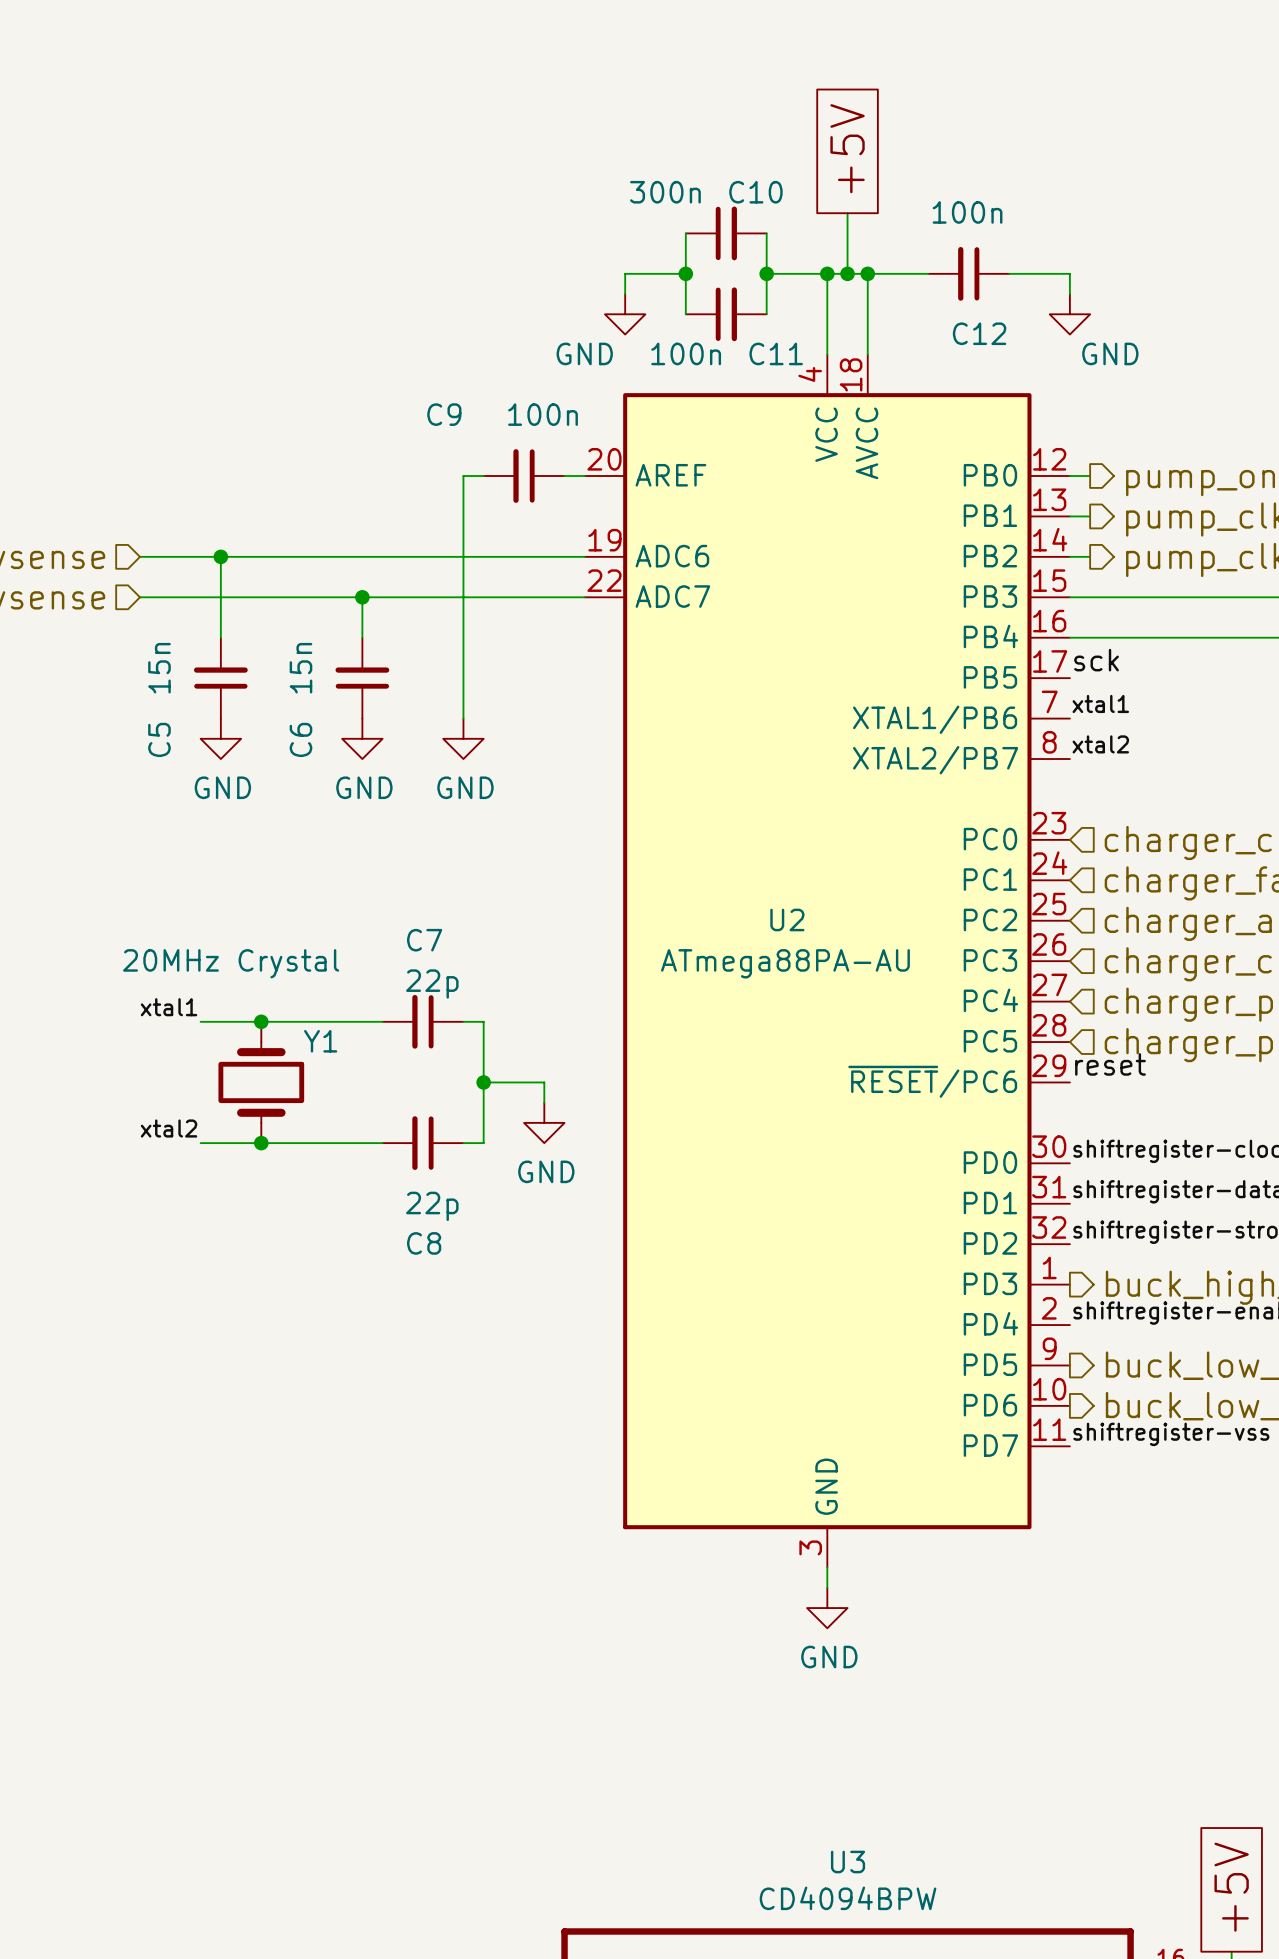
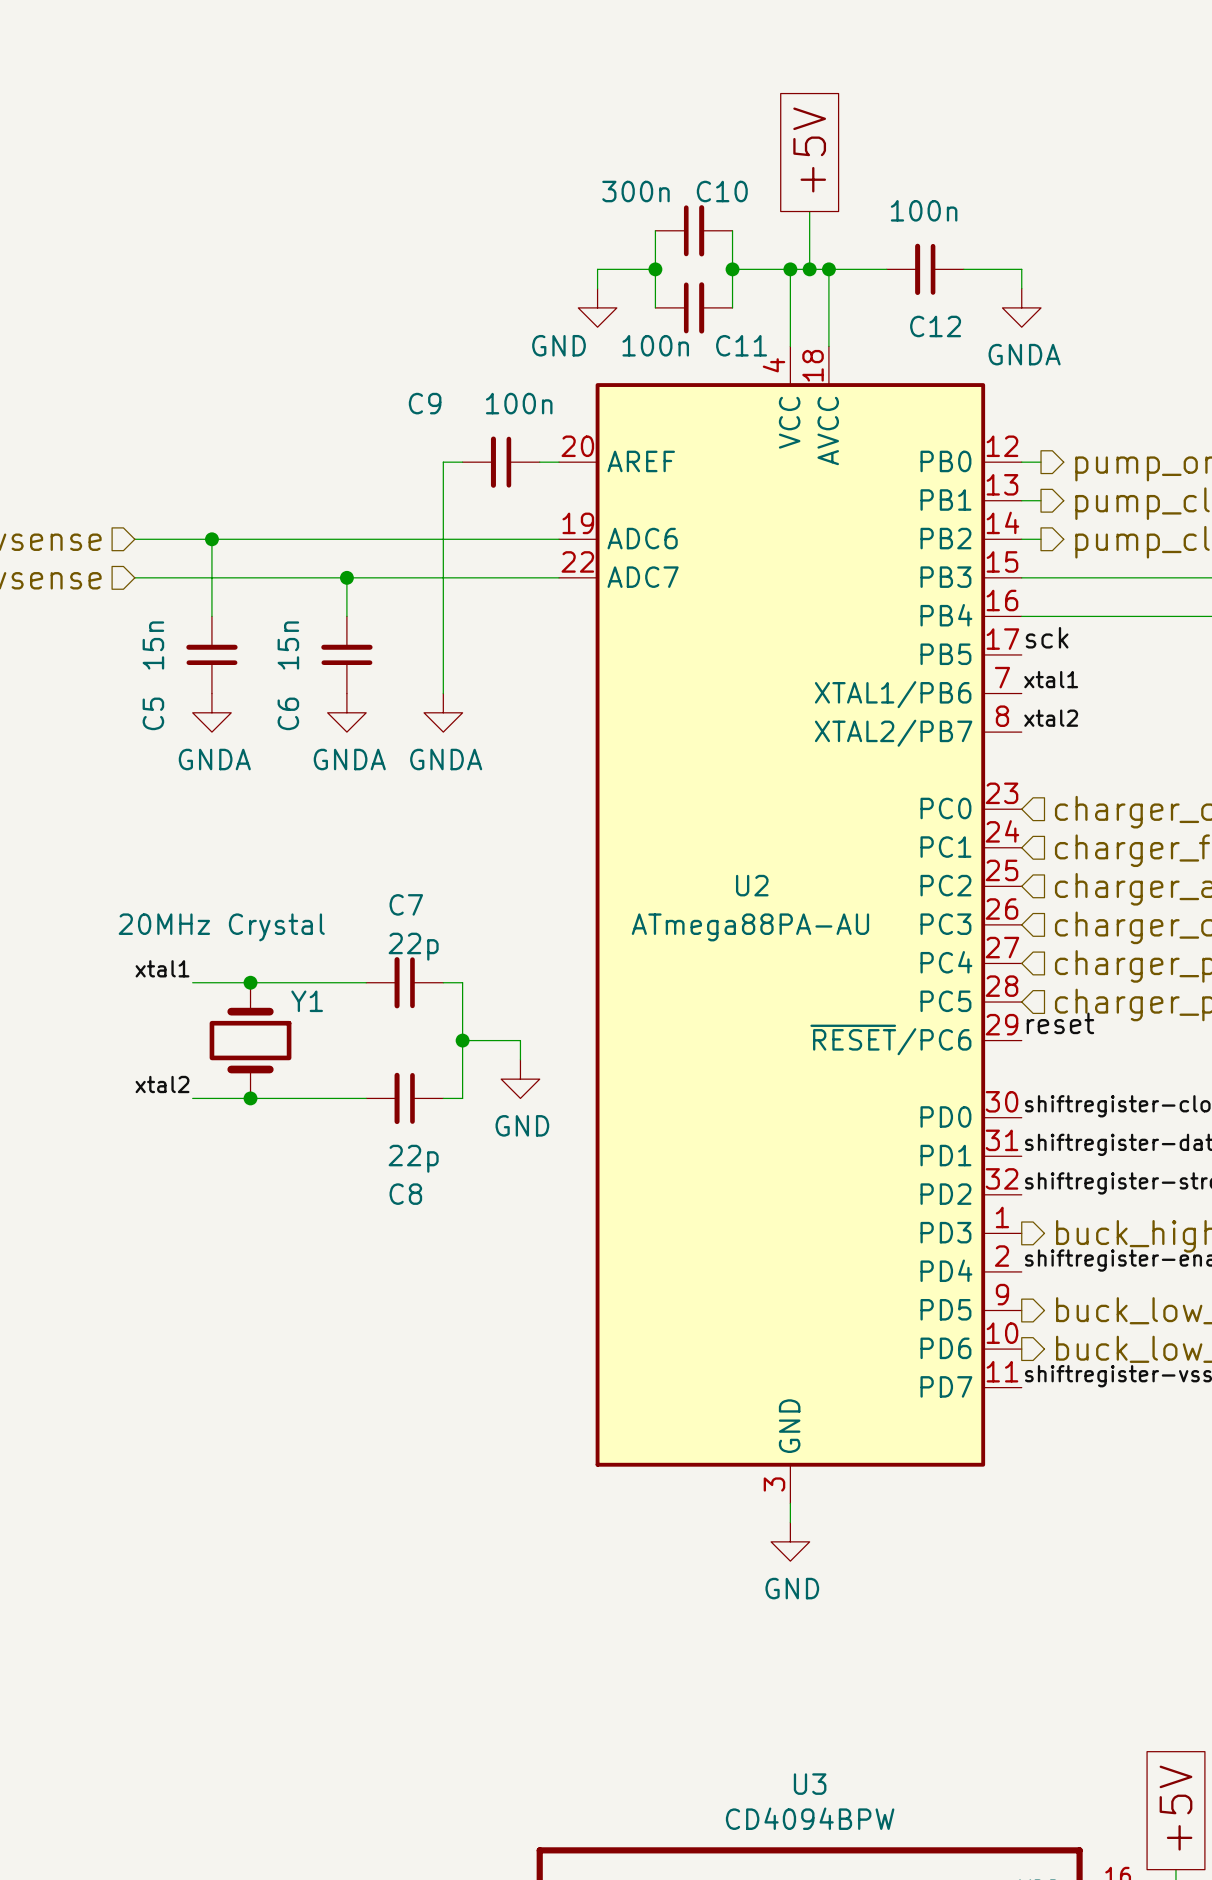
power symbol: GND (1069, 314) -> GNDA (1021, 307)
power symbol: GND (220, 738) -> GNDA (211, 712)
power symbol: GND (362, 738) -> GNDA (346, 712)
power symbol: GND (463, 738) -> GNDA (443, 712)

